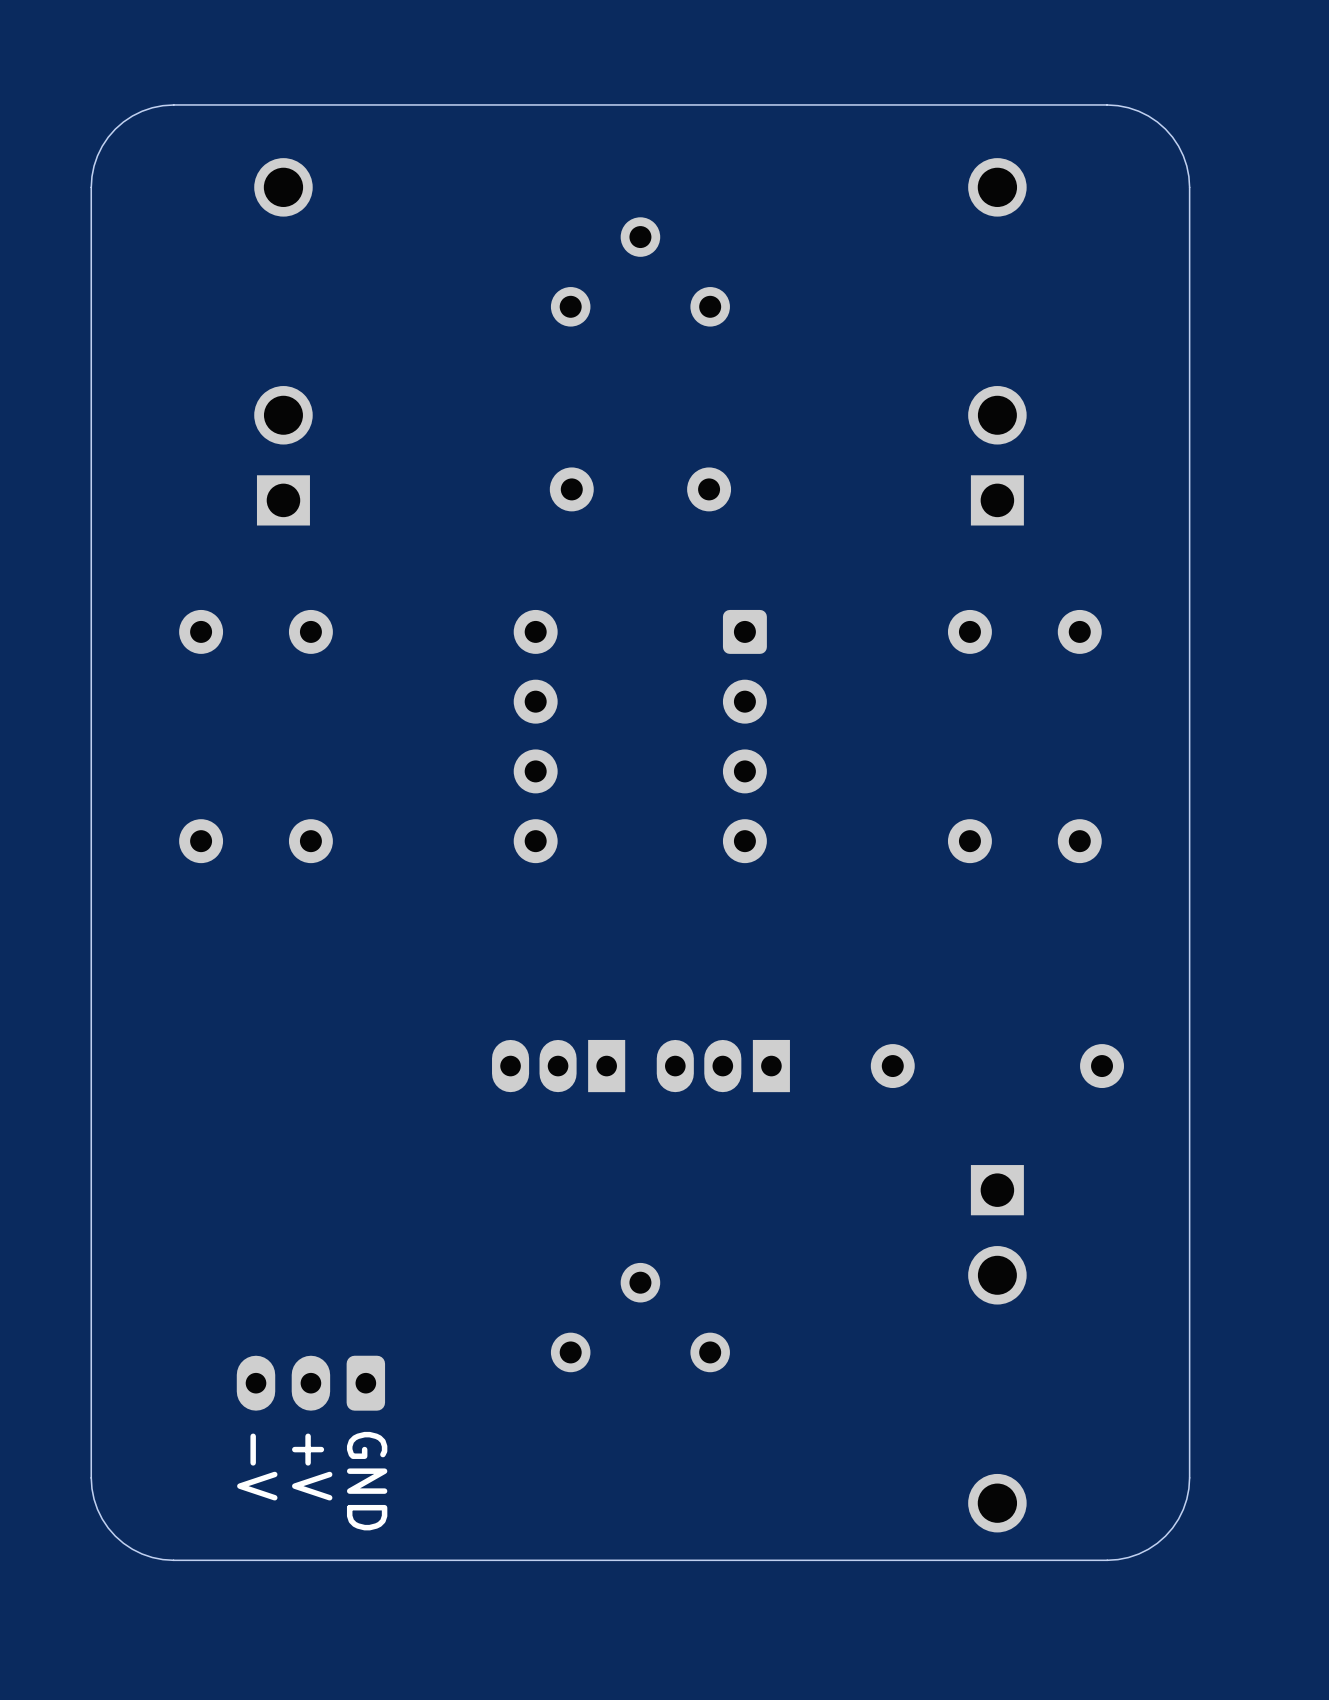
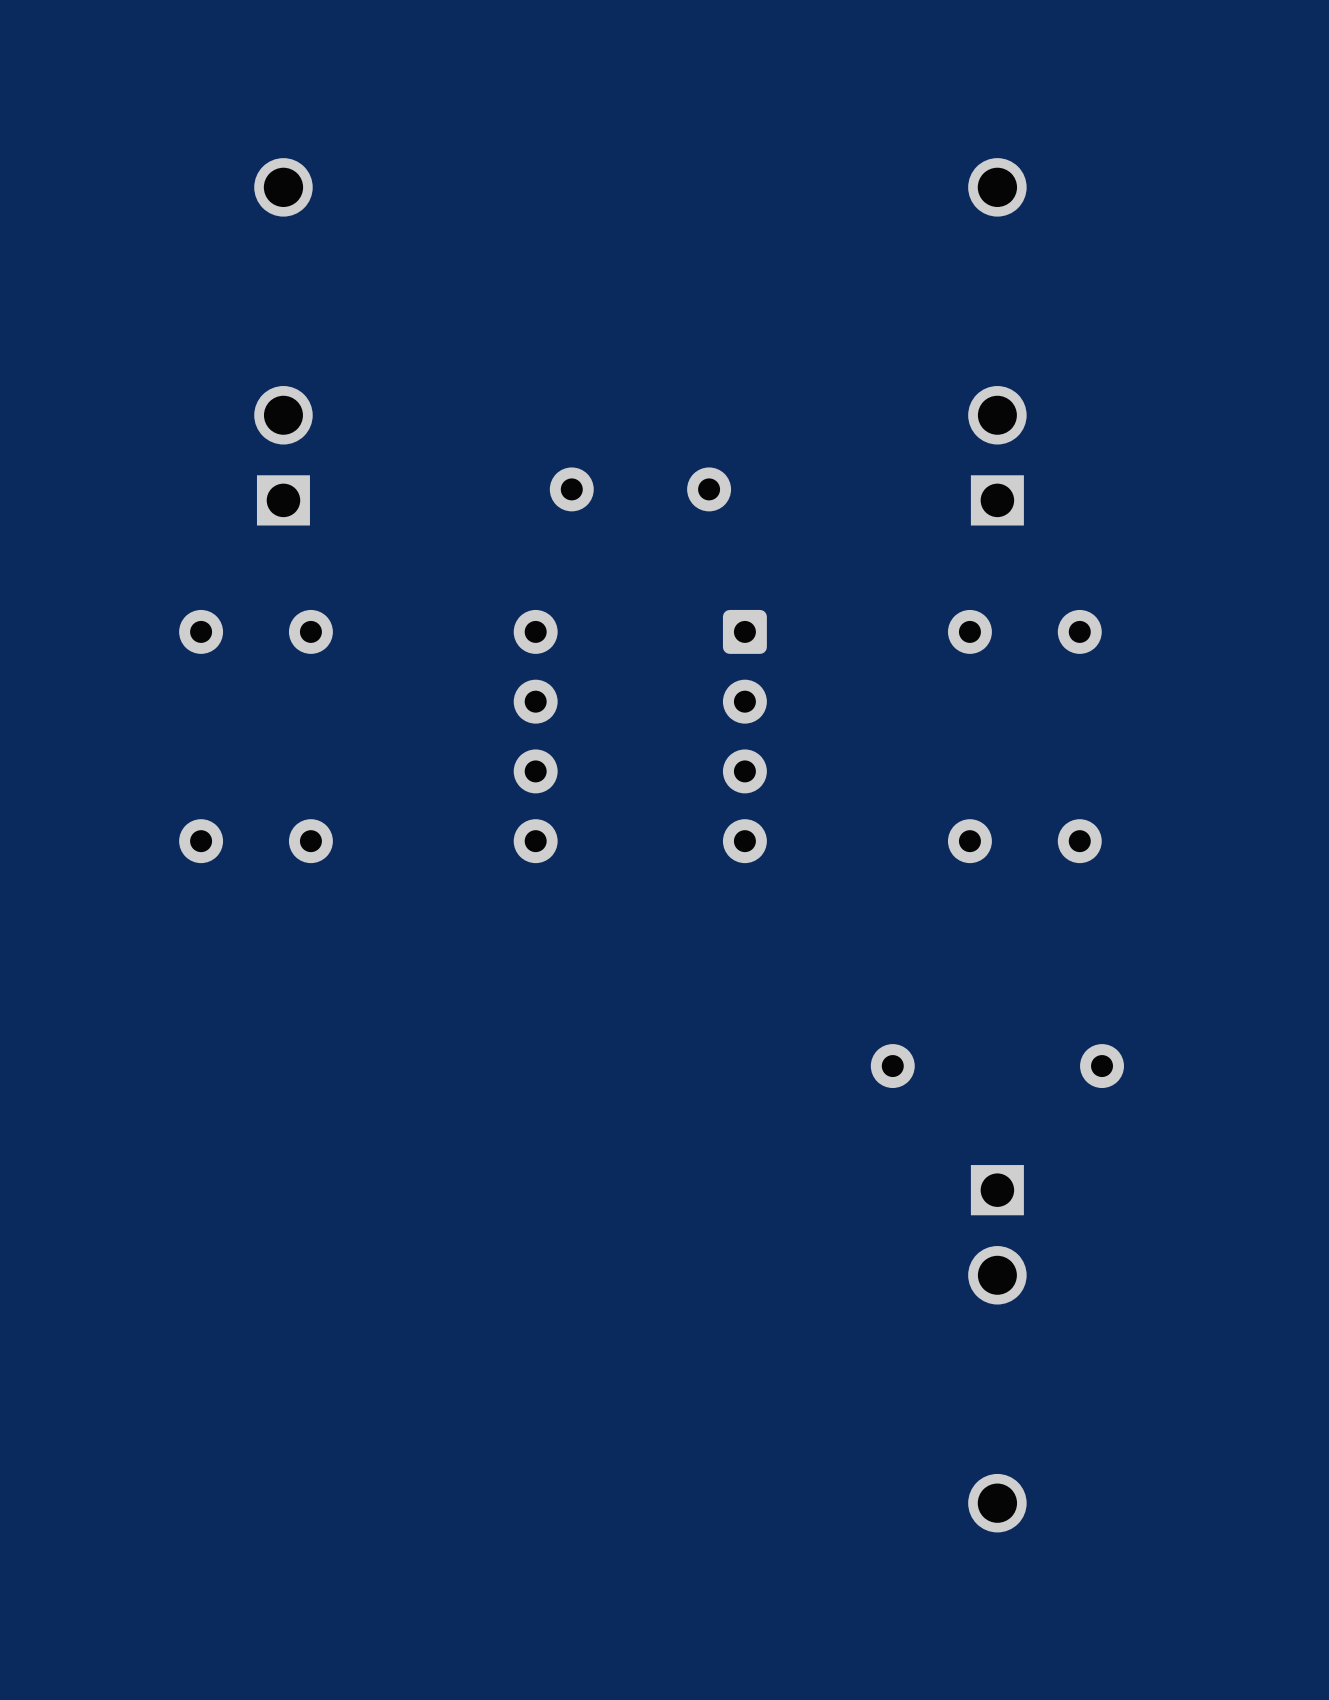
board edge: (1107, 104) (173, 104) (142, 111) (123, 122) (108, 137) (97, 155) (91, 187) (91, 1477) (94, 1499) (102, 1519) (123, 1543) (142, 1554) (173, 1560) (1107, 1560) (1138, 1554) (1157, 1543) (1172, 1528) (1186, 1499) (1189, 1477) (1189, 187) (1183, 155) (1165, 129) (1138, 111) (1107, 104) -> none
part: (640, 271) -> none
part: (558, 1066) -> none
part: (723, 1066) -> none
part: (640, 1317) -> none
part: (310, 1383) -> none

